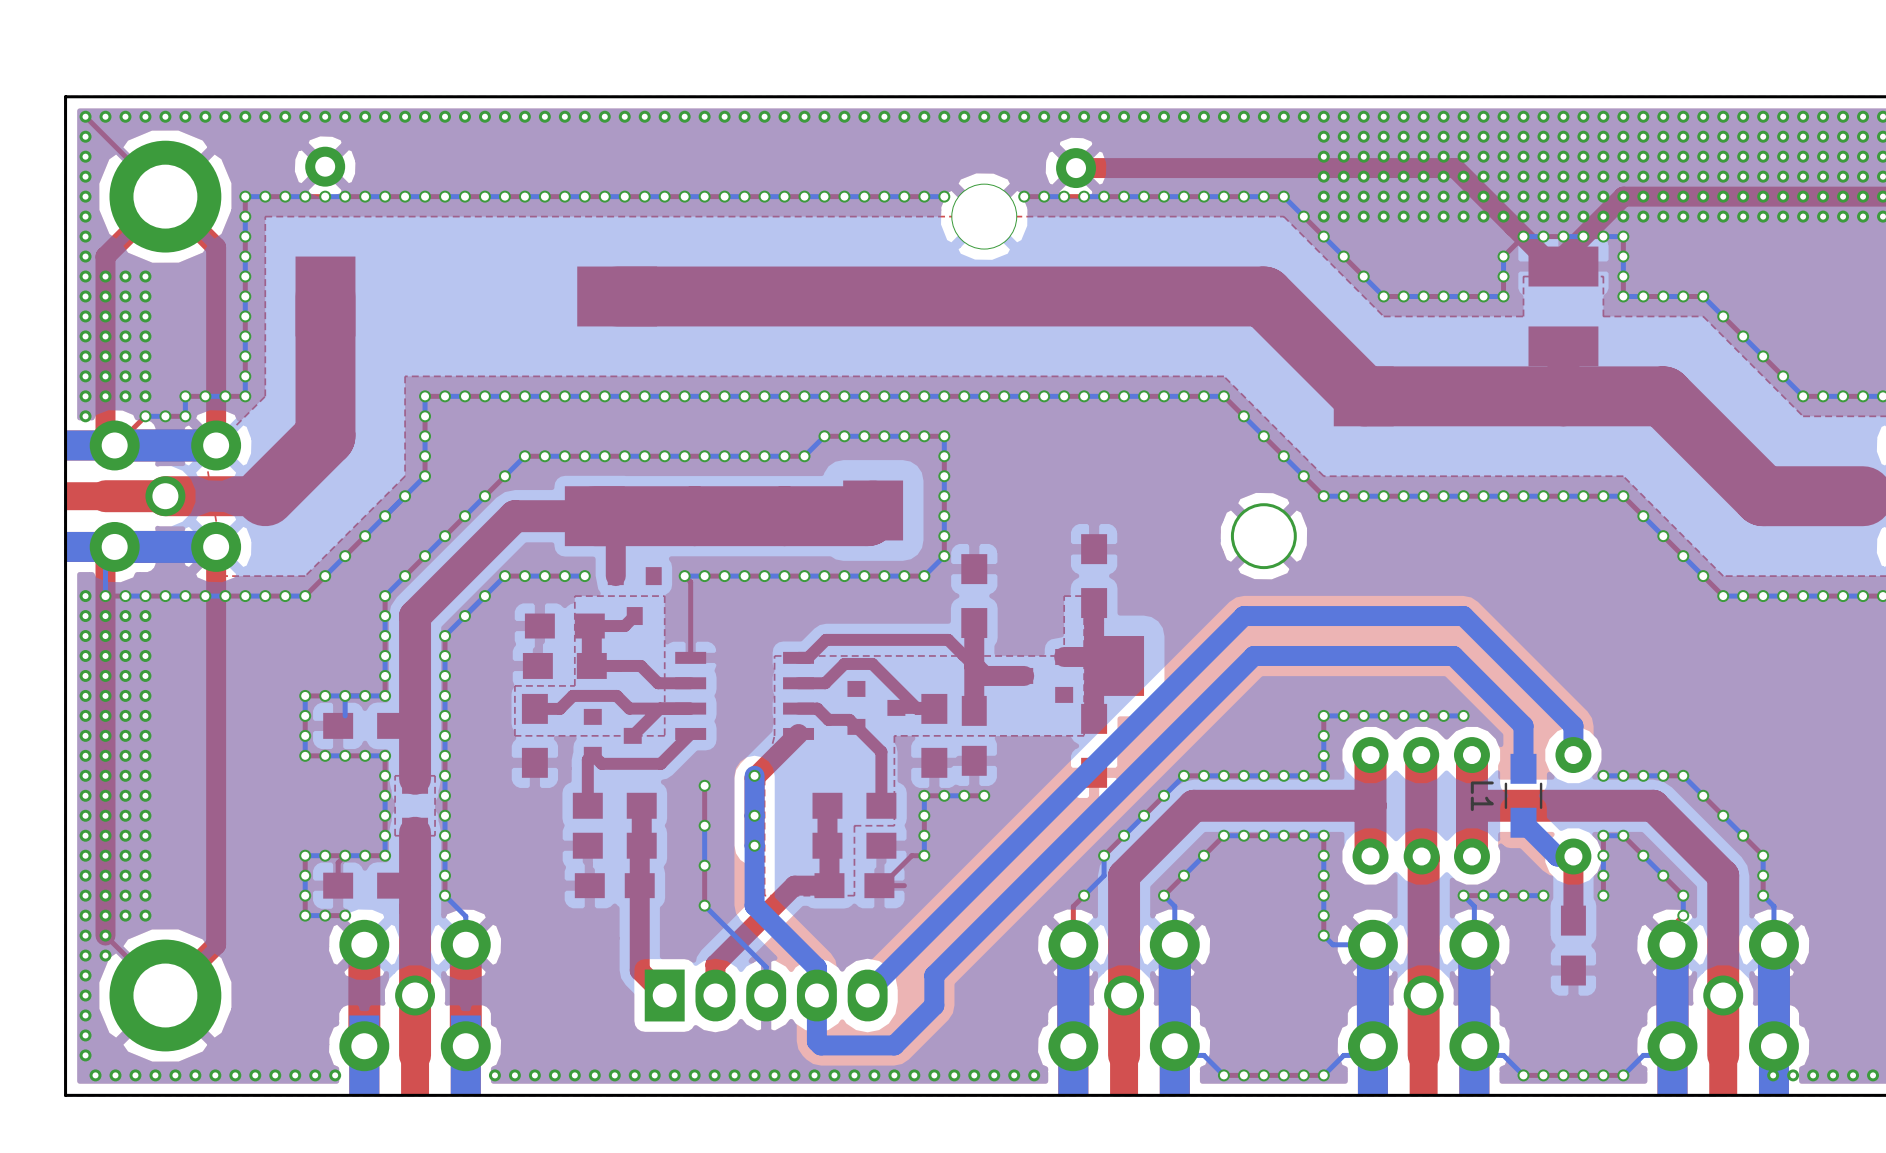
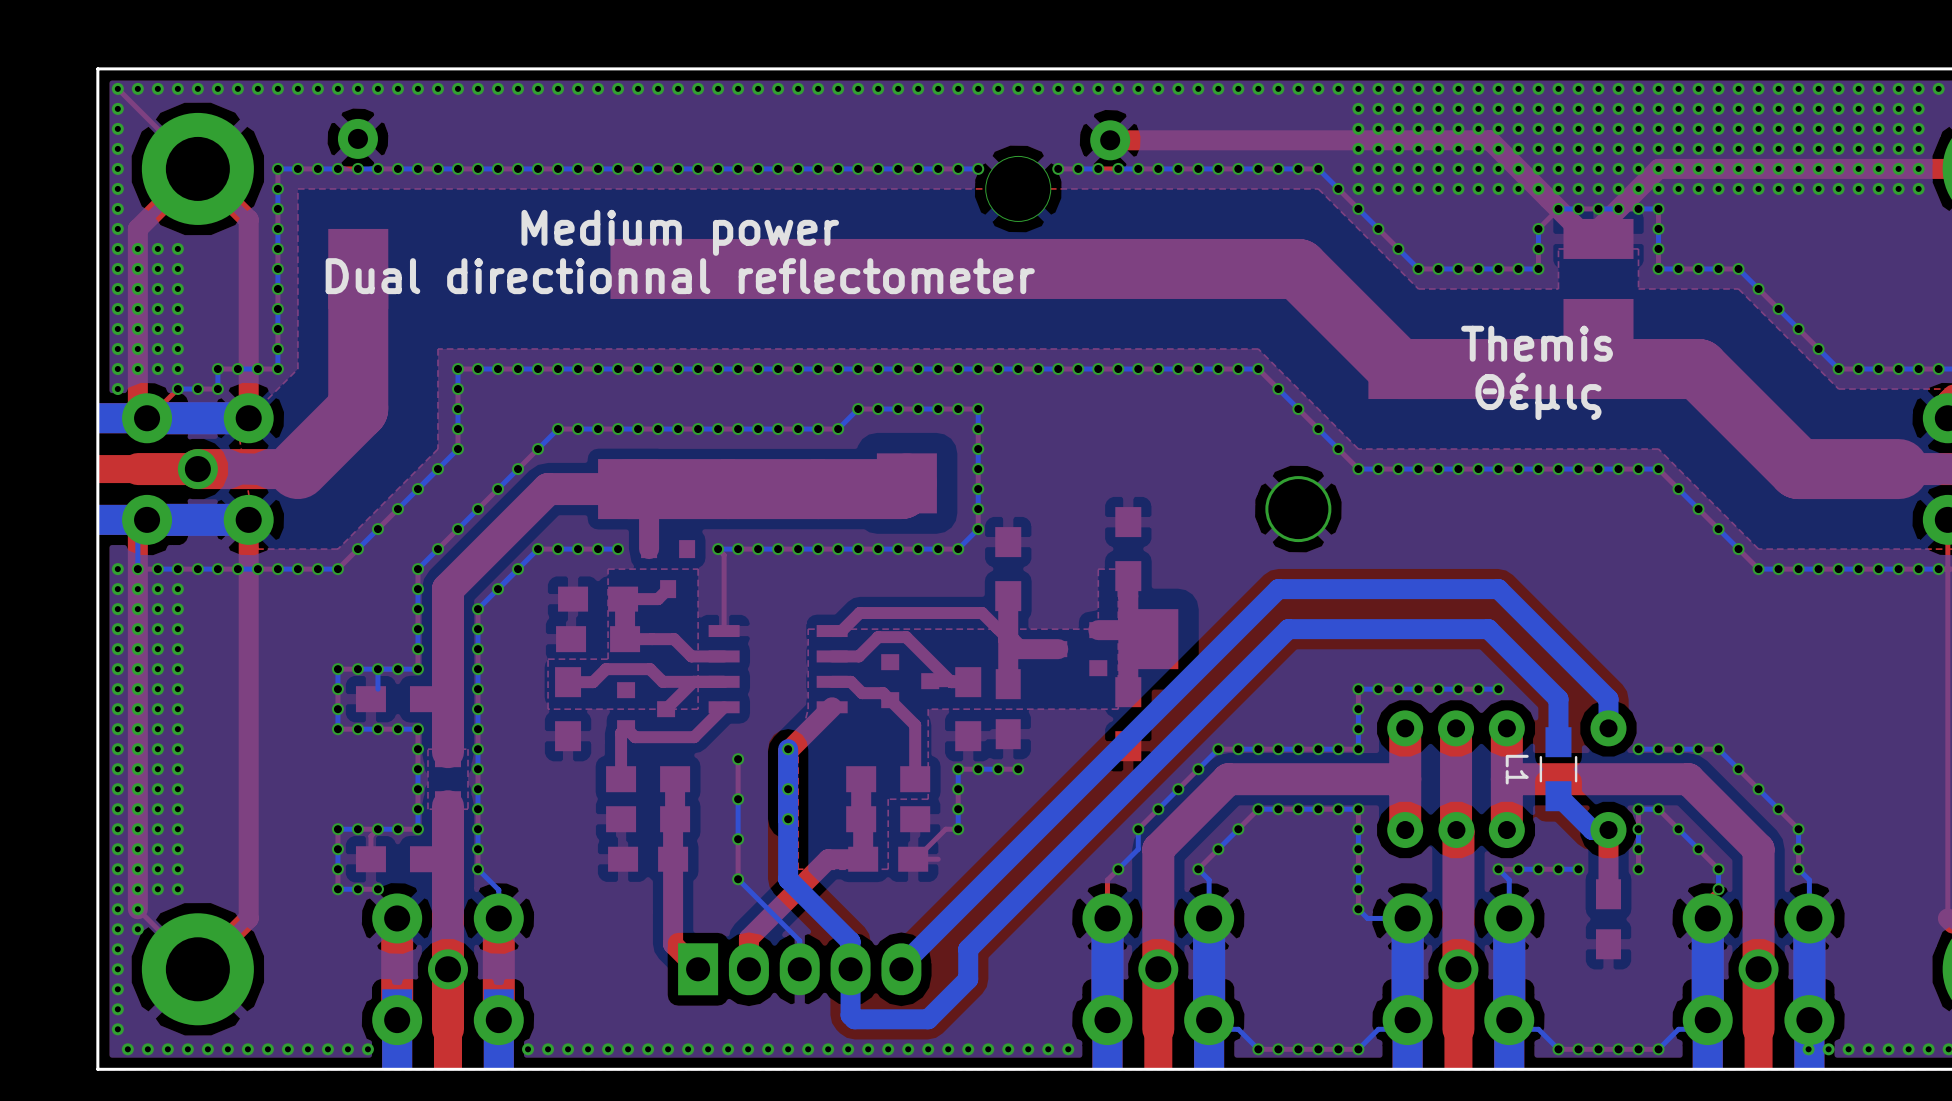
text: none -> Medium power (680, 232)
text: none -> Dual directionnal reflectometer (680, 276)
text: none -> Themis (1537, 343)
text: none -> Θέμις (1538, 396)

